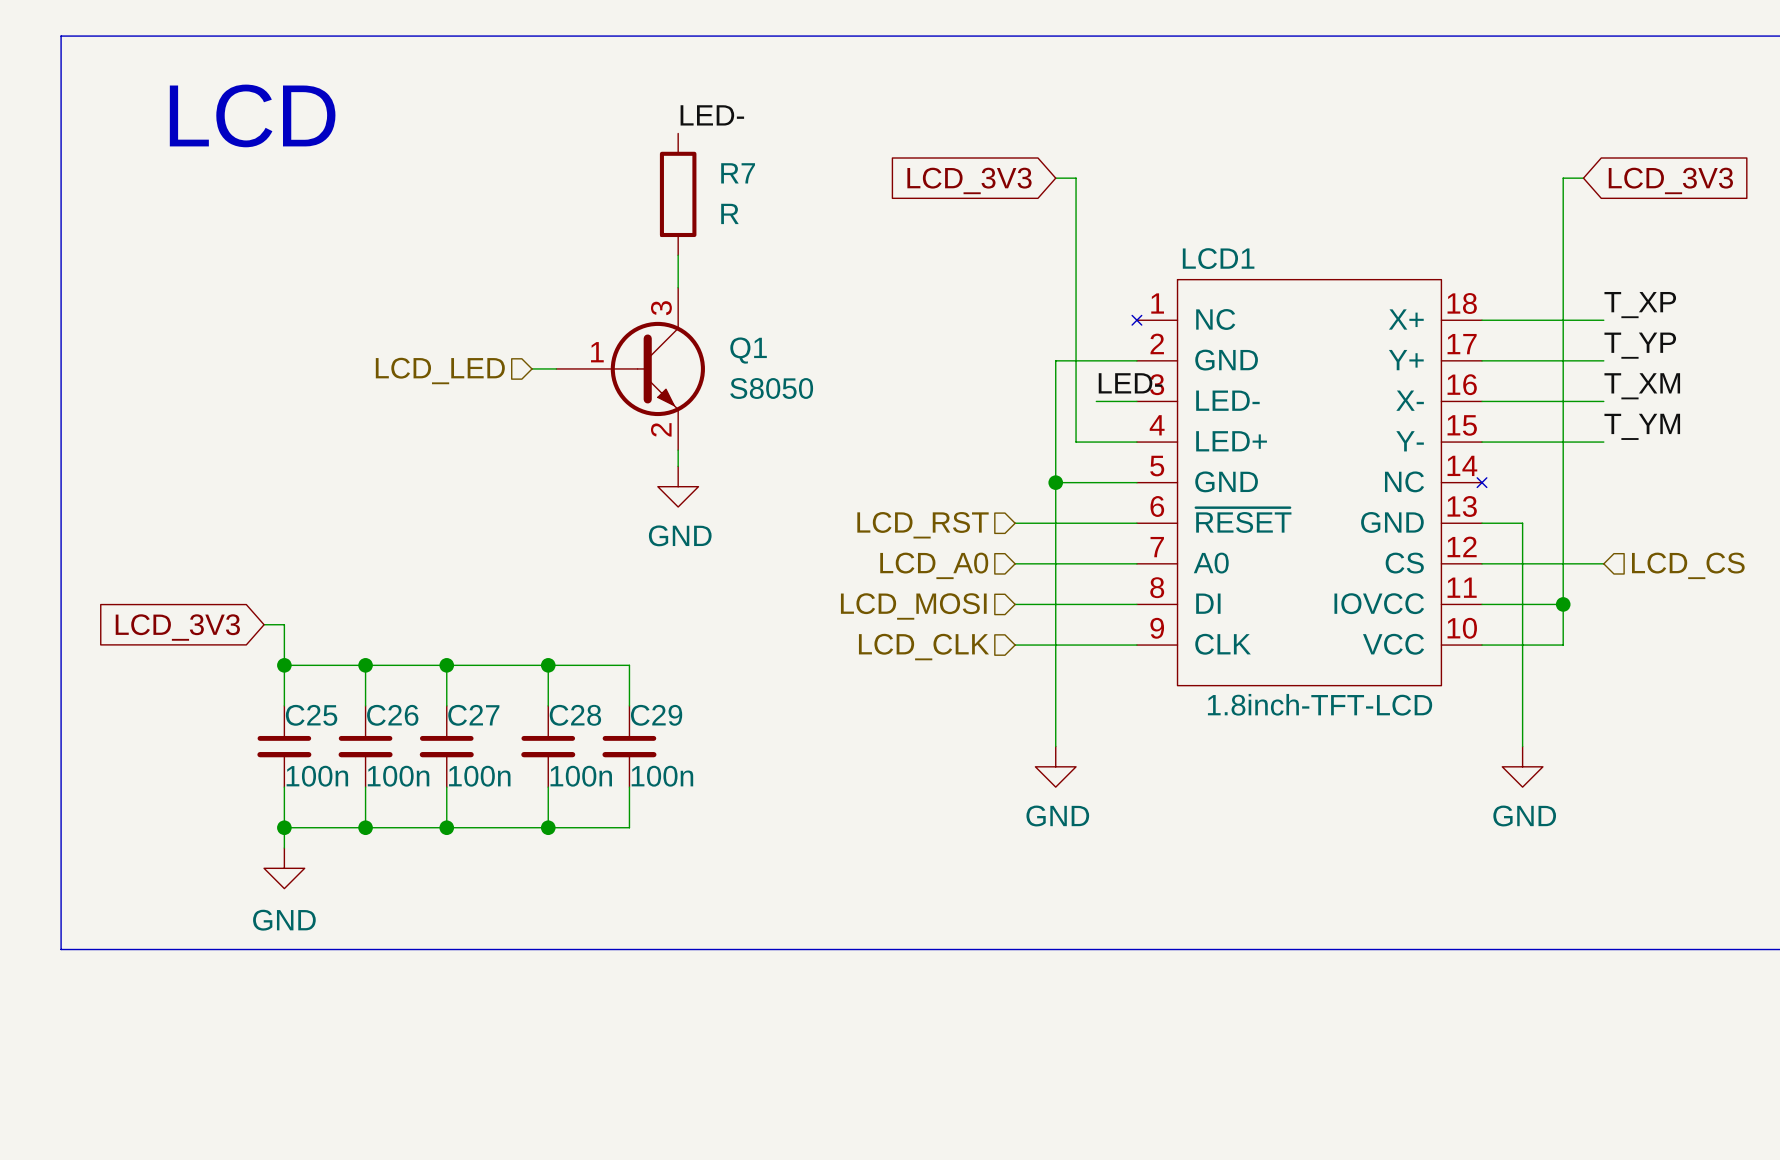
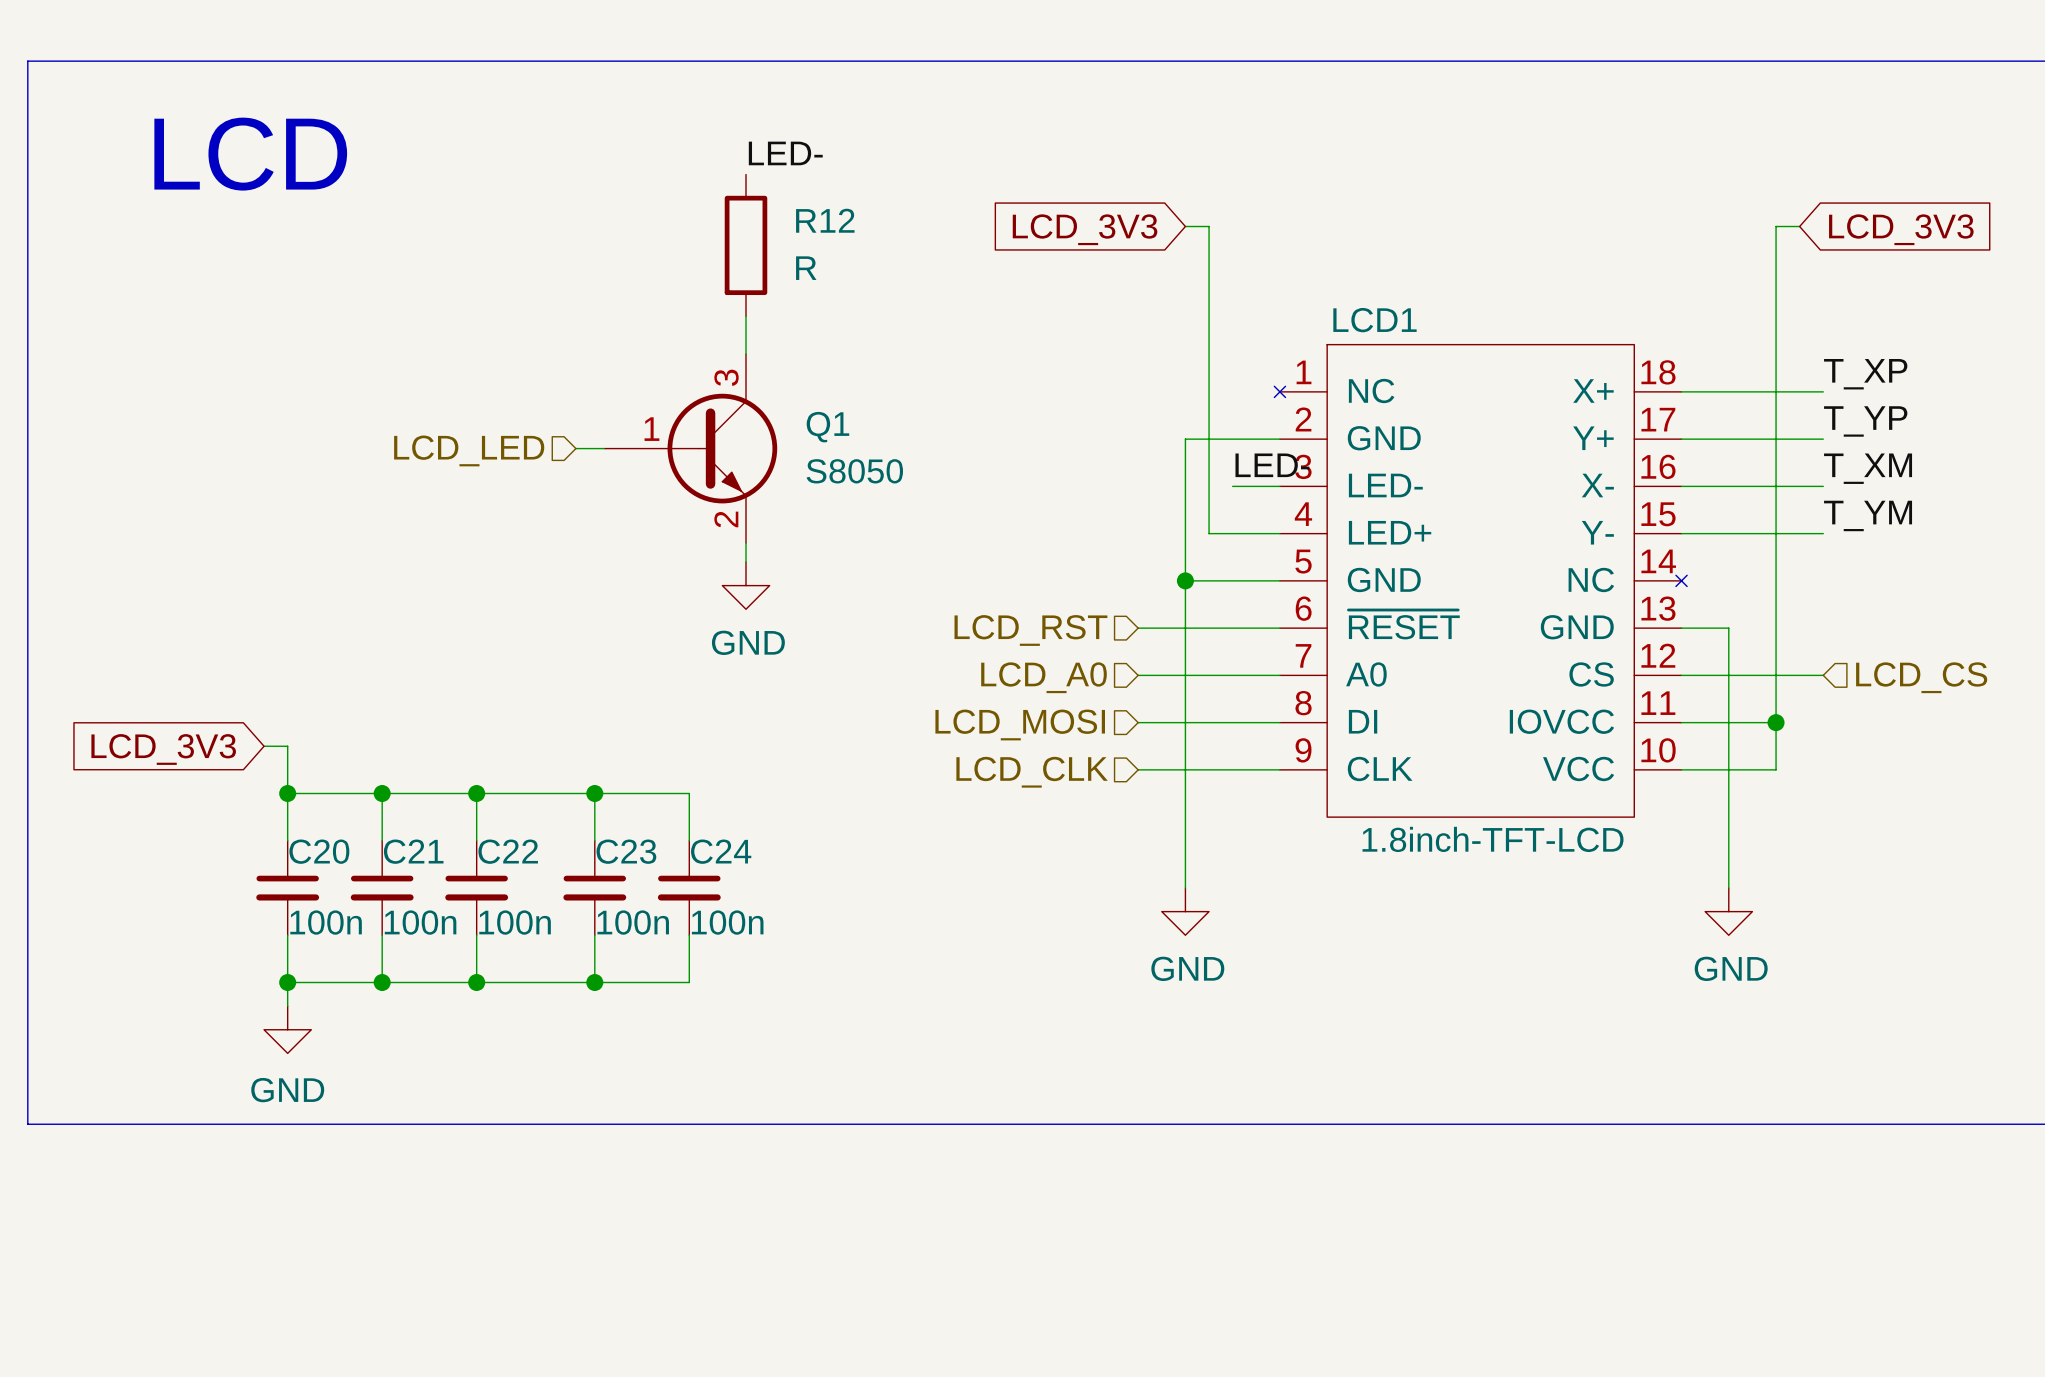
R7 name: R7 (738, 173) -> R12 (825, 220)
C25 name: C25 (311, 715) -> C20 (319, 851)
C26 name: C26 (392, 715) -> C21 (413, 851)
C27 name: C27 (473, 715) -> C22 (508, 851)
C28 name: C28 (575, 715) -> C23 (626, 851)
C29 name: C29 (656, 715) -> C24 (721, 851)

